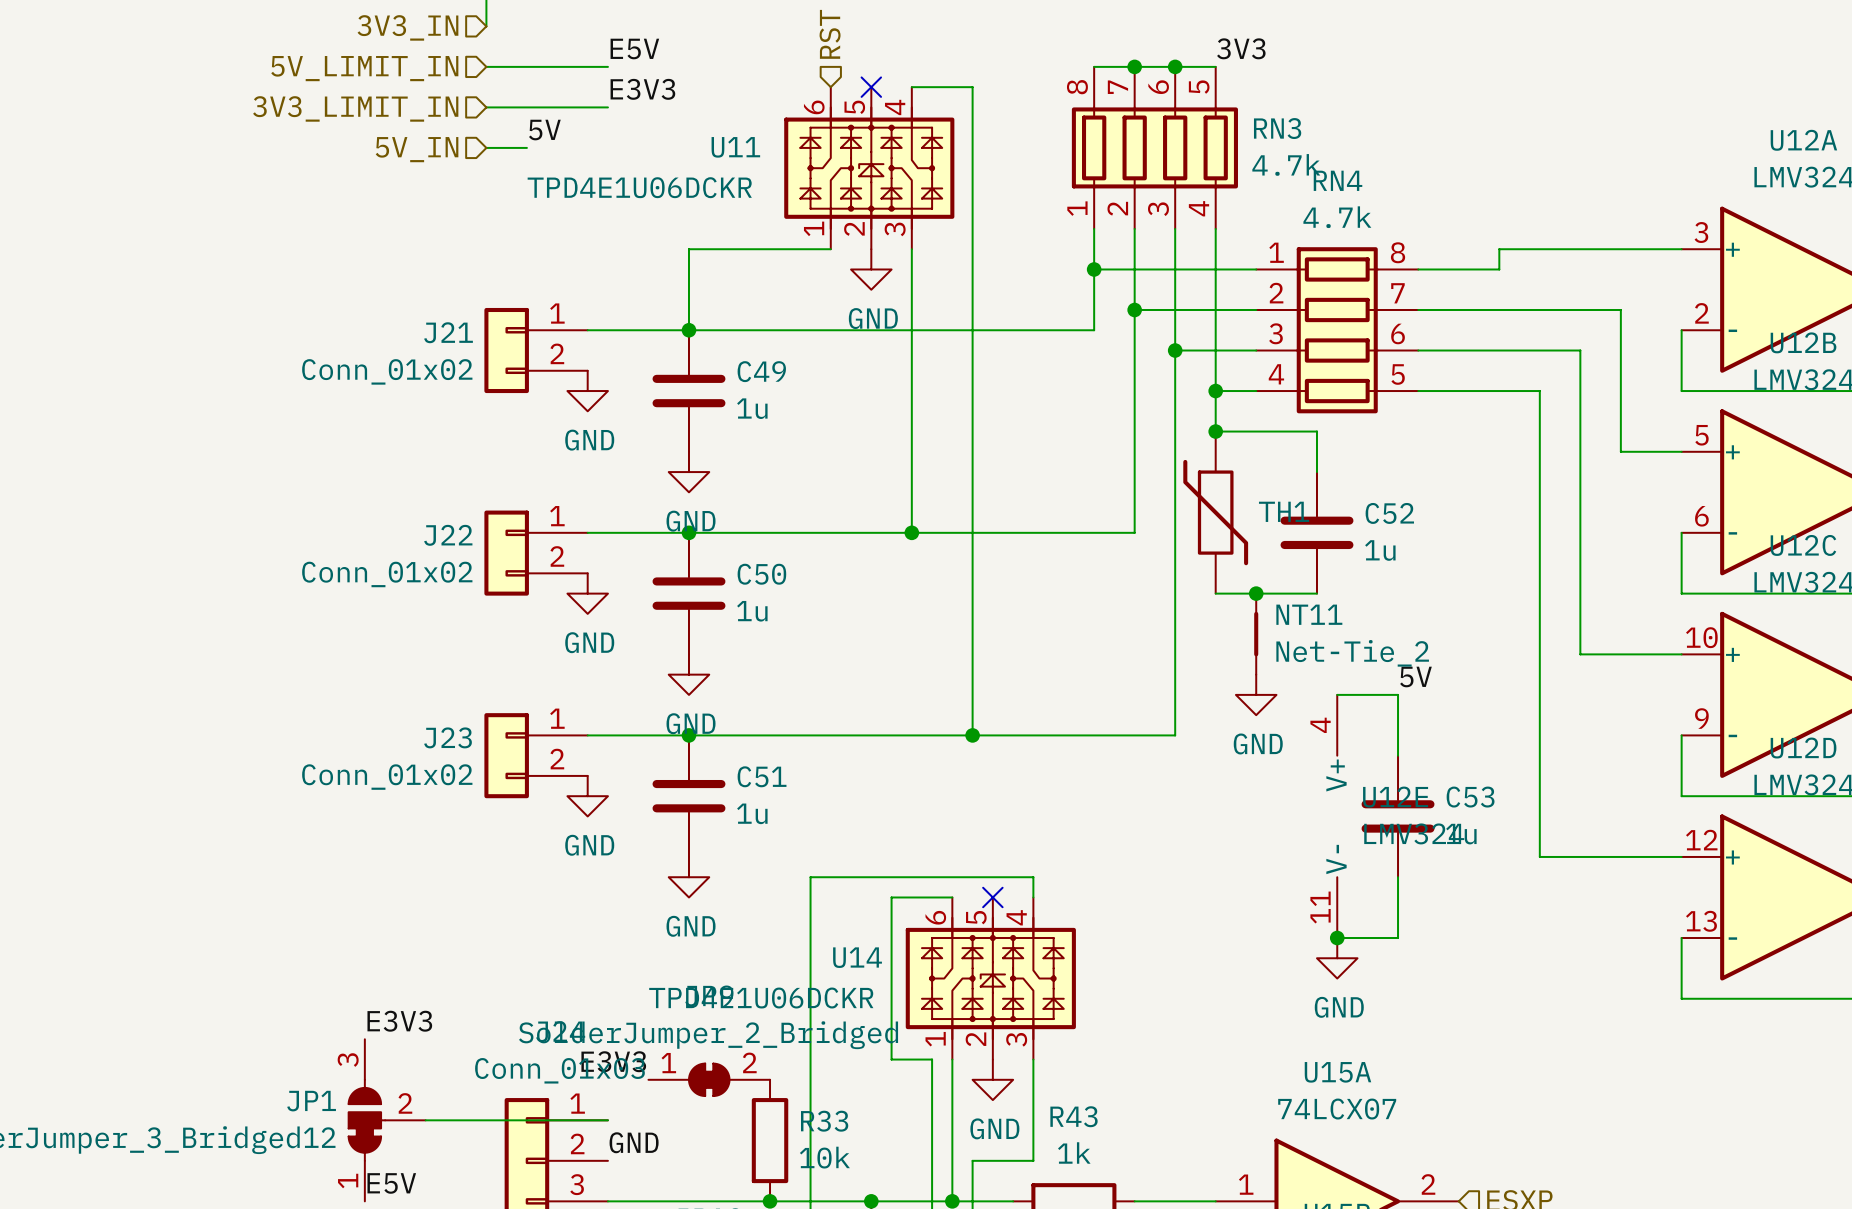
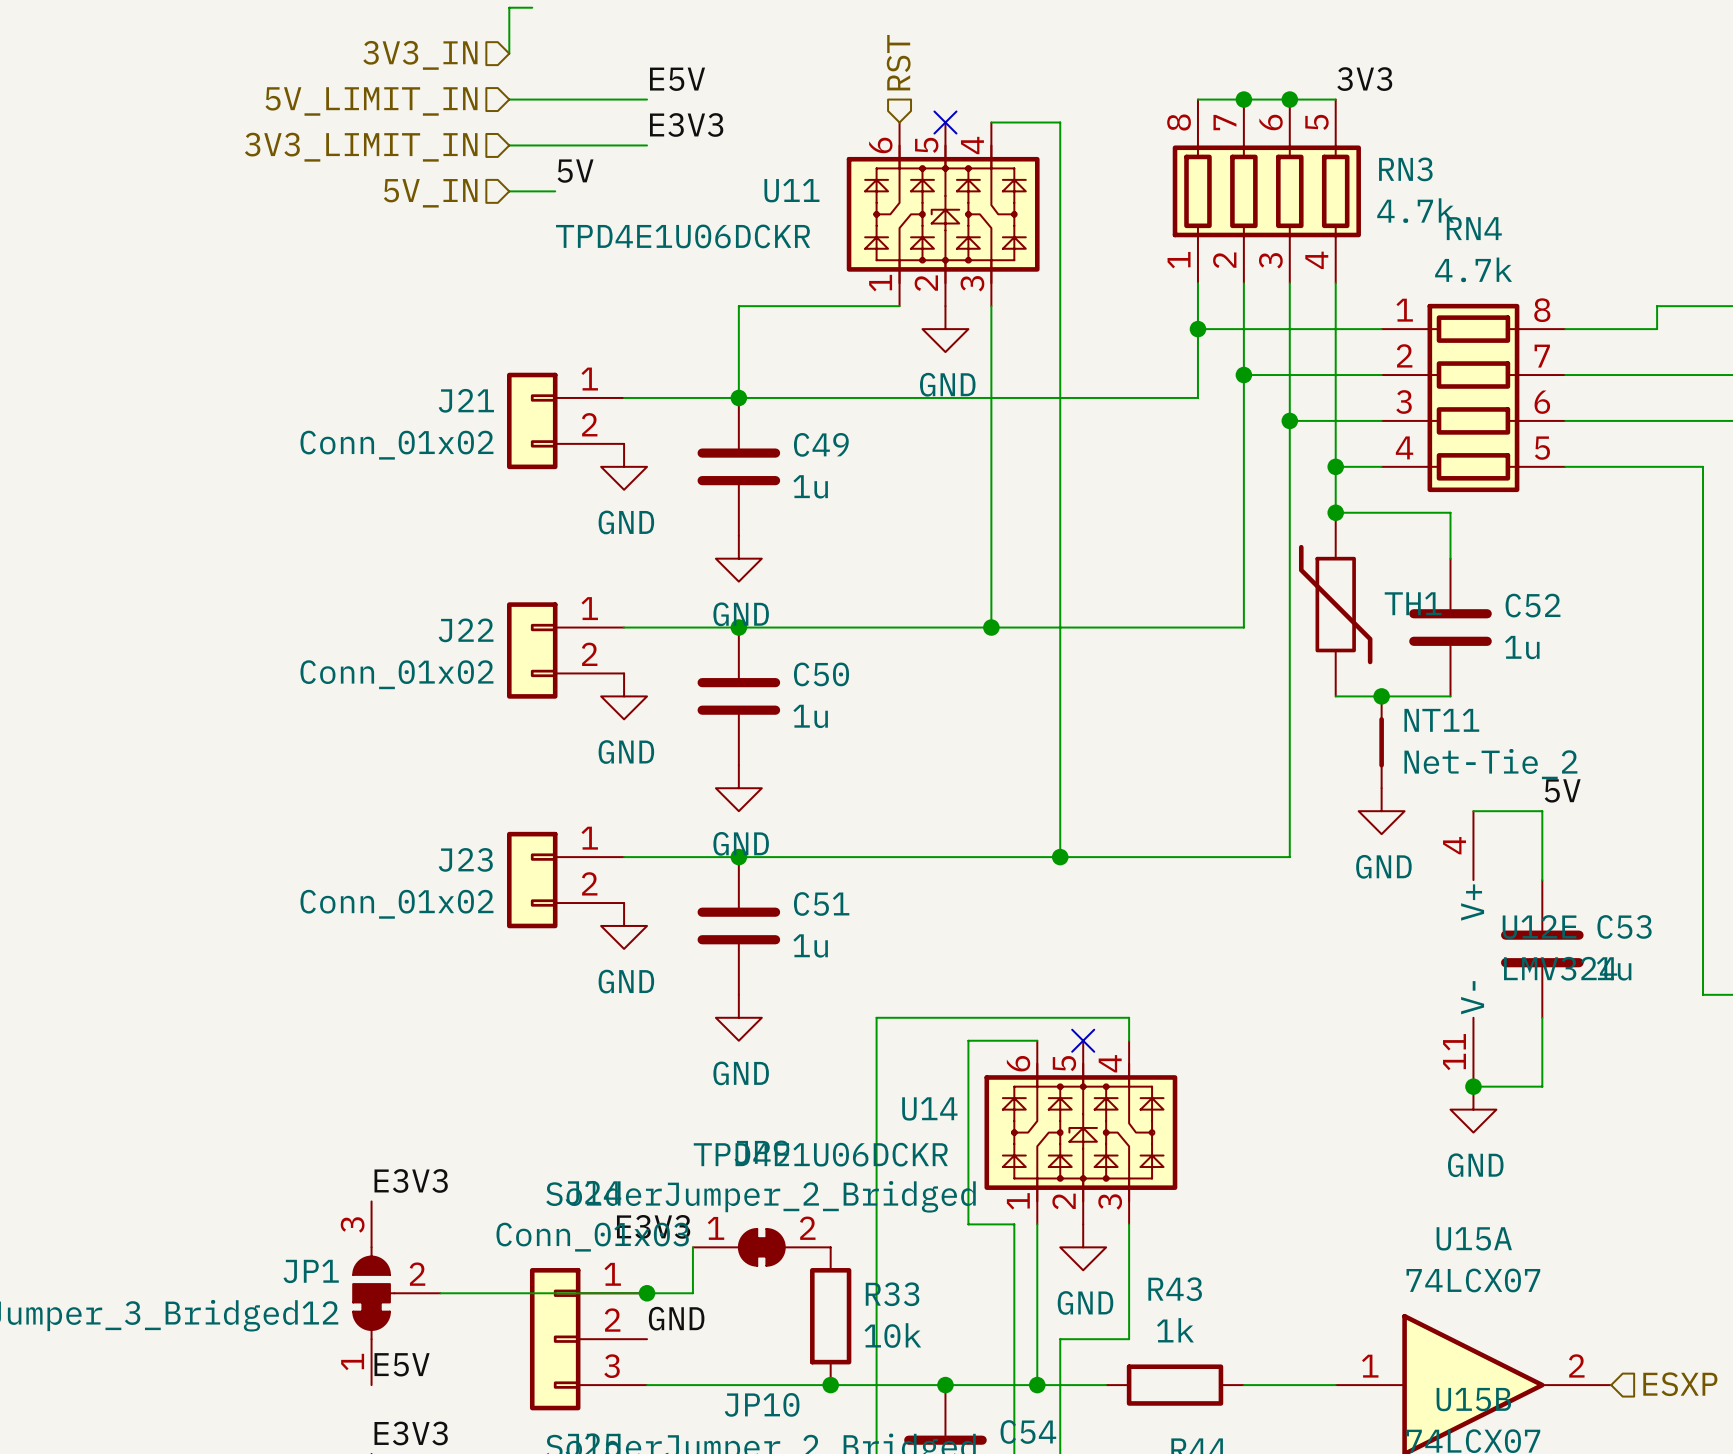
wire: none -> (692, 1247) (692, 1293) (647, 1293)
junction: none -> (647, 1293)

